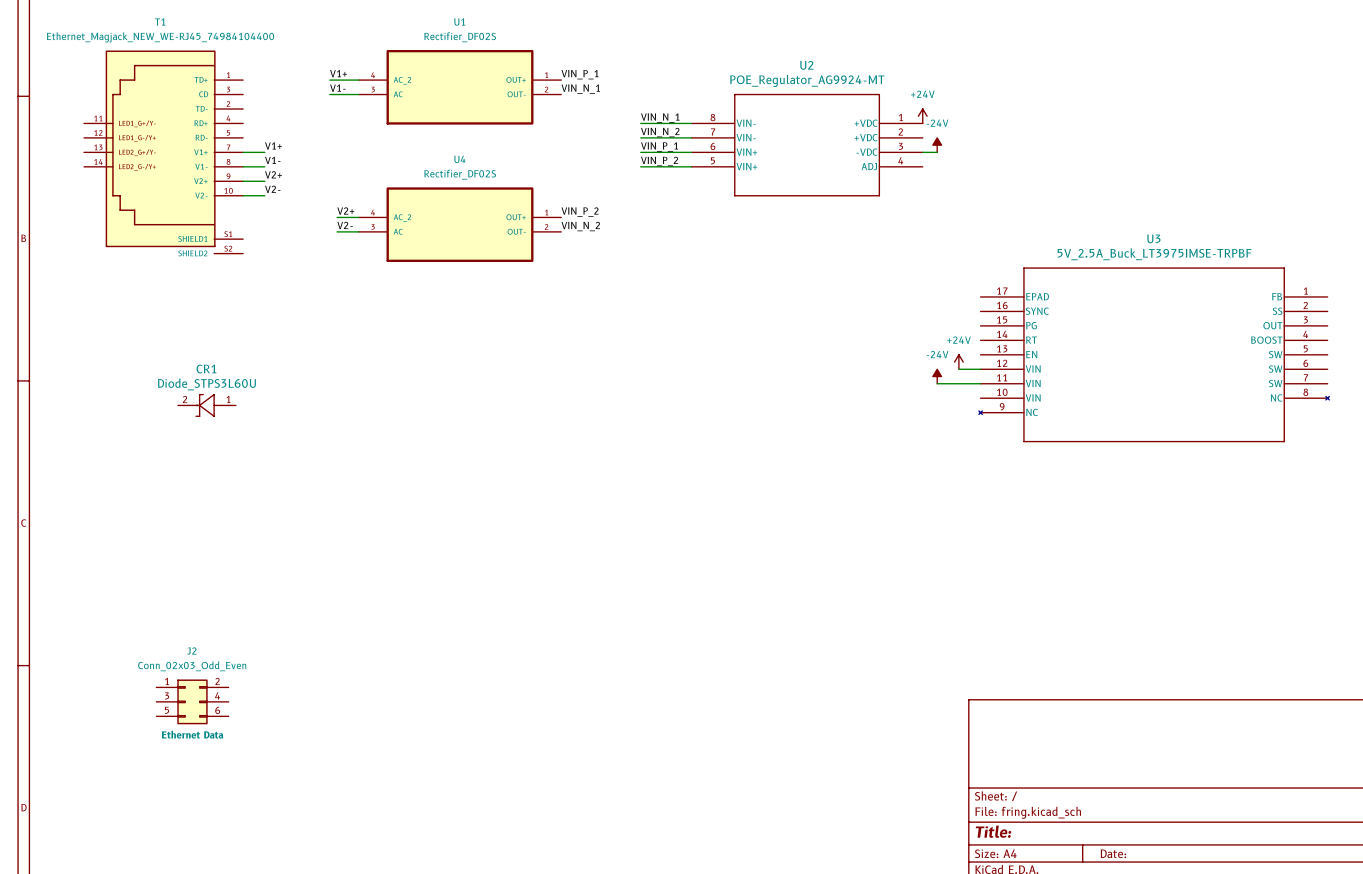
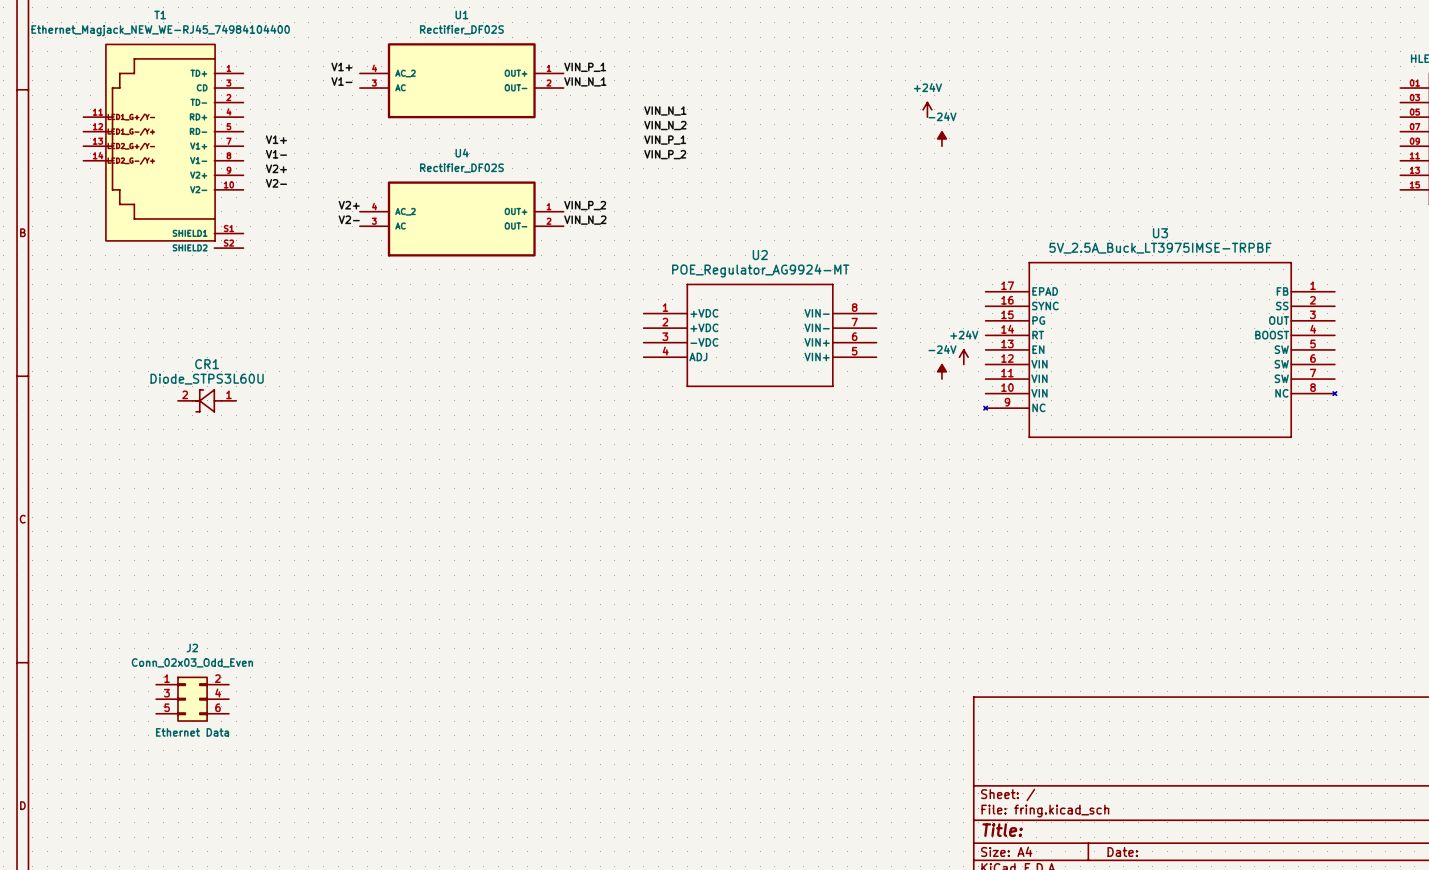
wire: (329, 80) (358, 80) -> none
wire: (329, 94) (358, 94) -> none
wire: (640, 123) (691, 123) -> none
wire: (640, 137) (691, 137) -> none
U2 flip: as is (807, 145) -> left-right (760, 335)
U2 position: (807, 145) -> (760, 335)
wire: (243, 152) (264, 152) -> none
wire: (640, 152) (691, 152) -> none
wire: (922, 152) (937, 152) -> none
wire: (243, 166) (264, 166) -> none
wire: (640, 166) (691, 166) -> none
wire: (243, 181) (264, 181) -> none
wire: (243, 195) (264, 195) -> none
wire: (337, 217) (358, 217) -> none
wire: (337, 231) (358, 231) -> none
wire: (958, 369) (980, 369) -> none
wire: (937, 383) (980, 383) -> none

